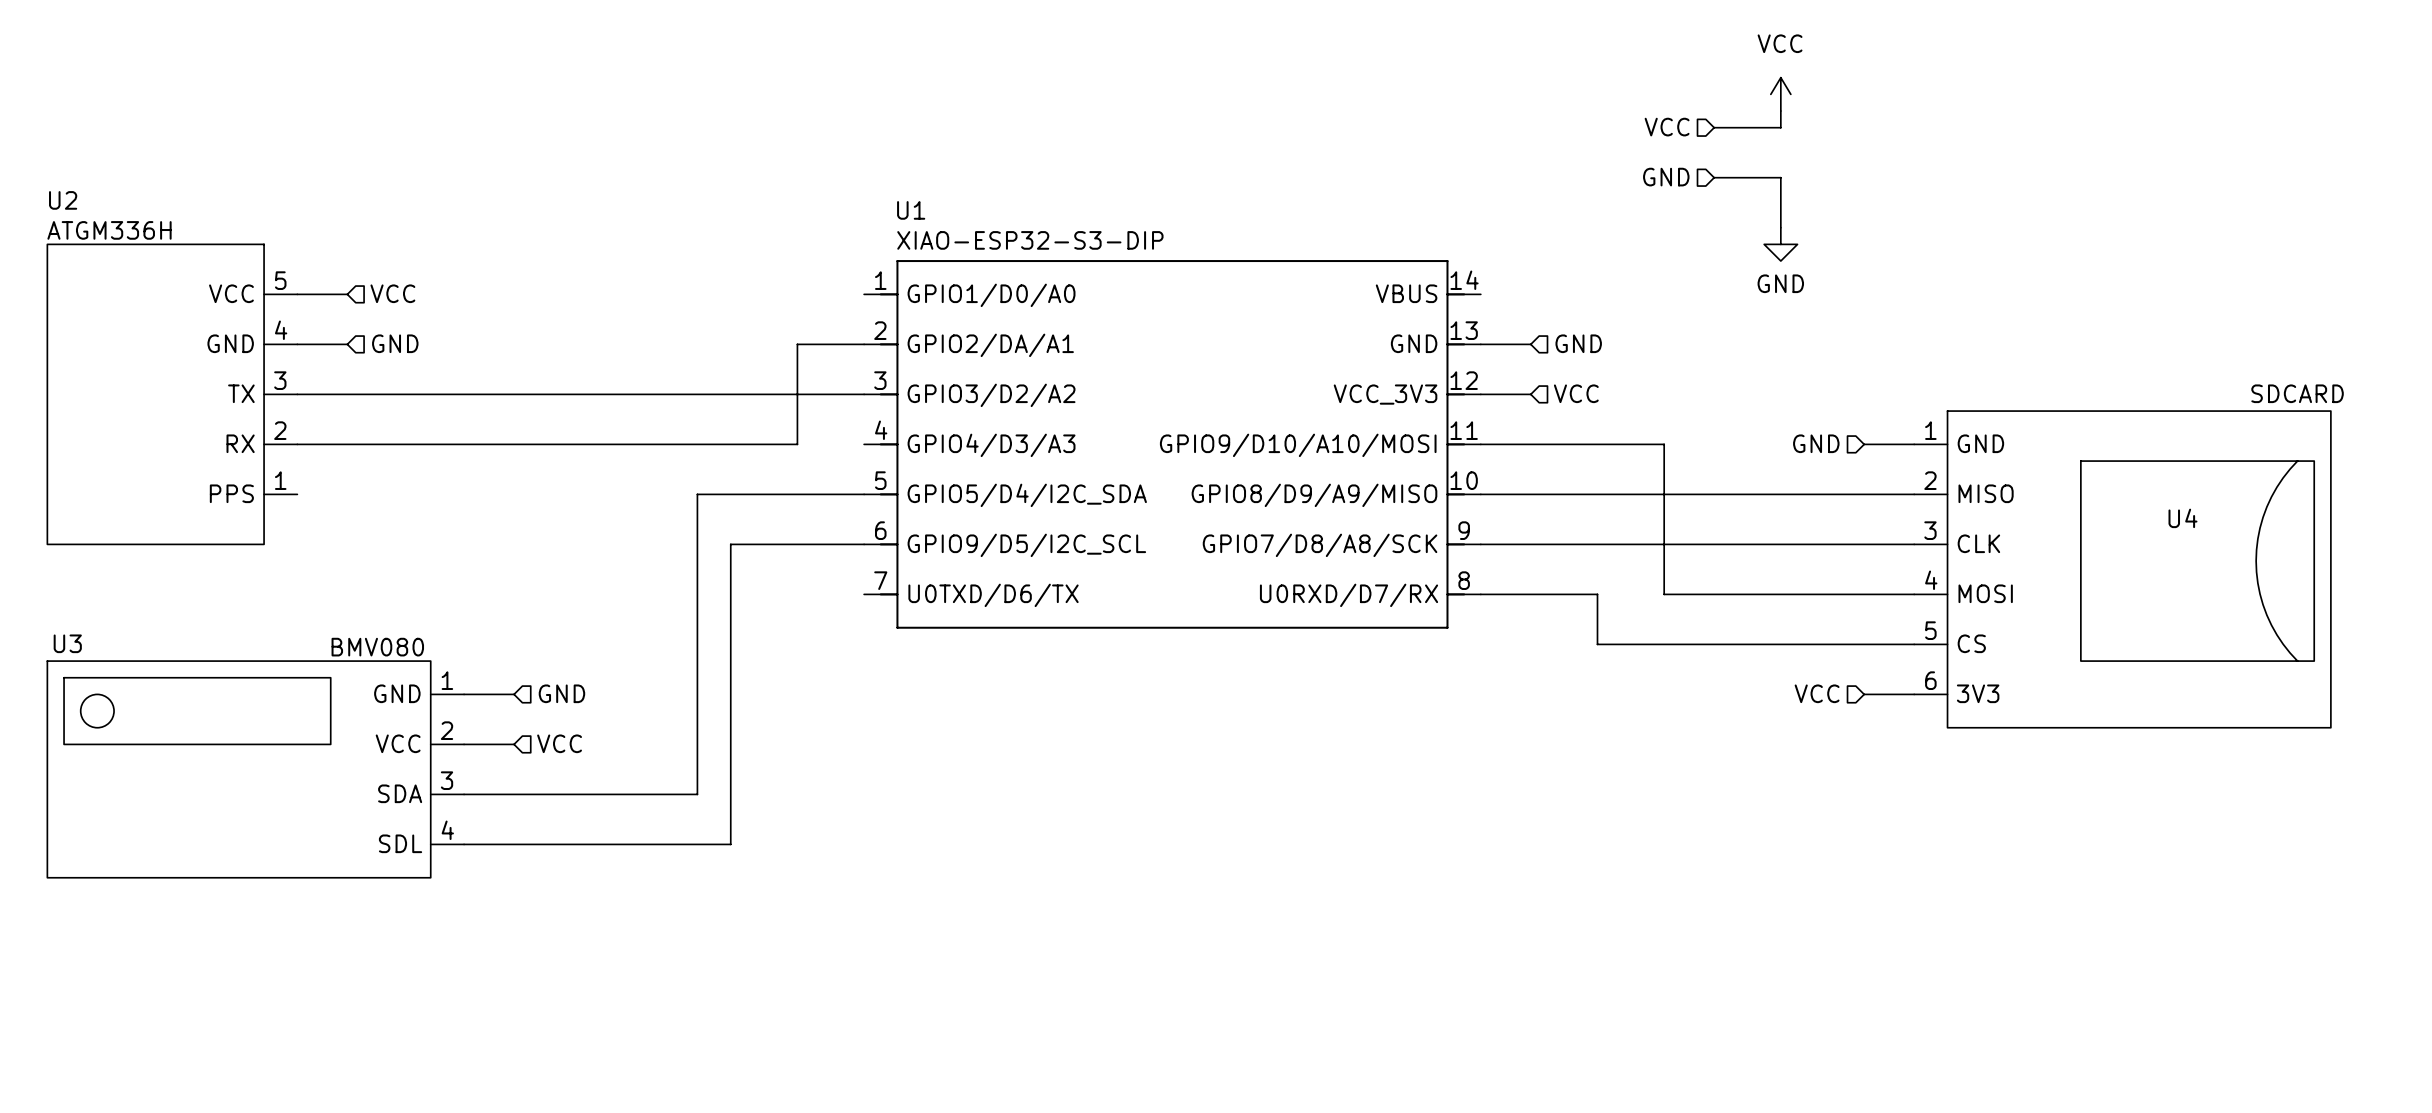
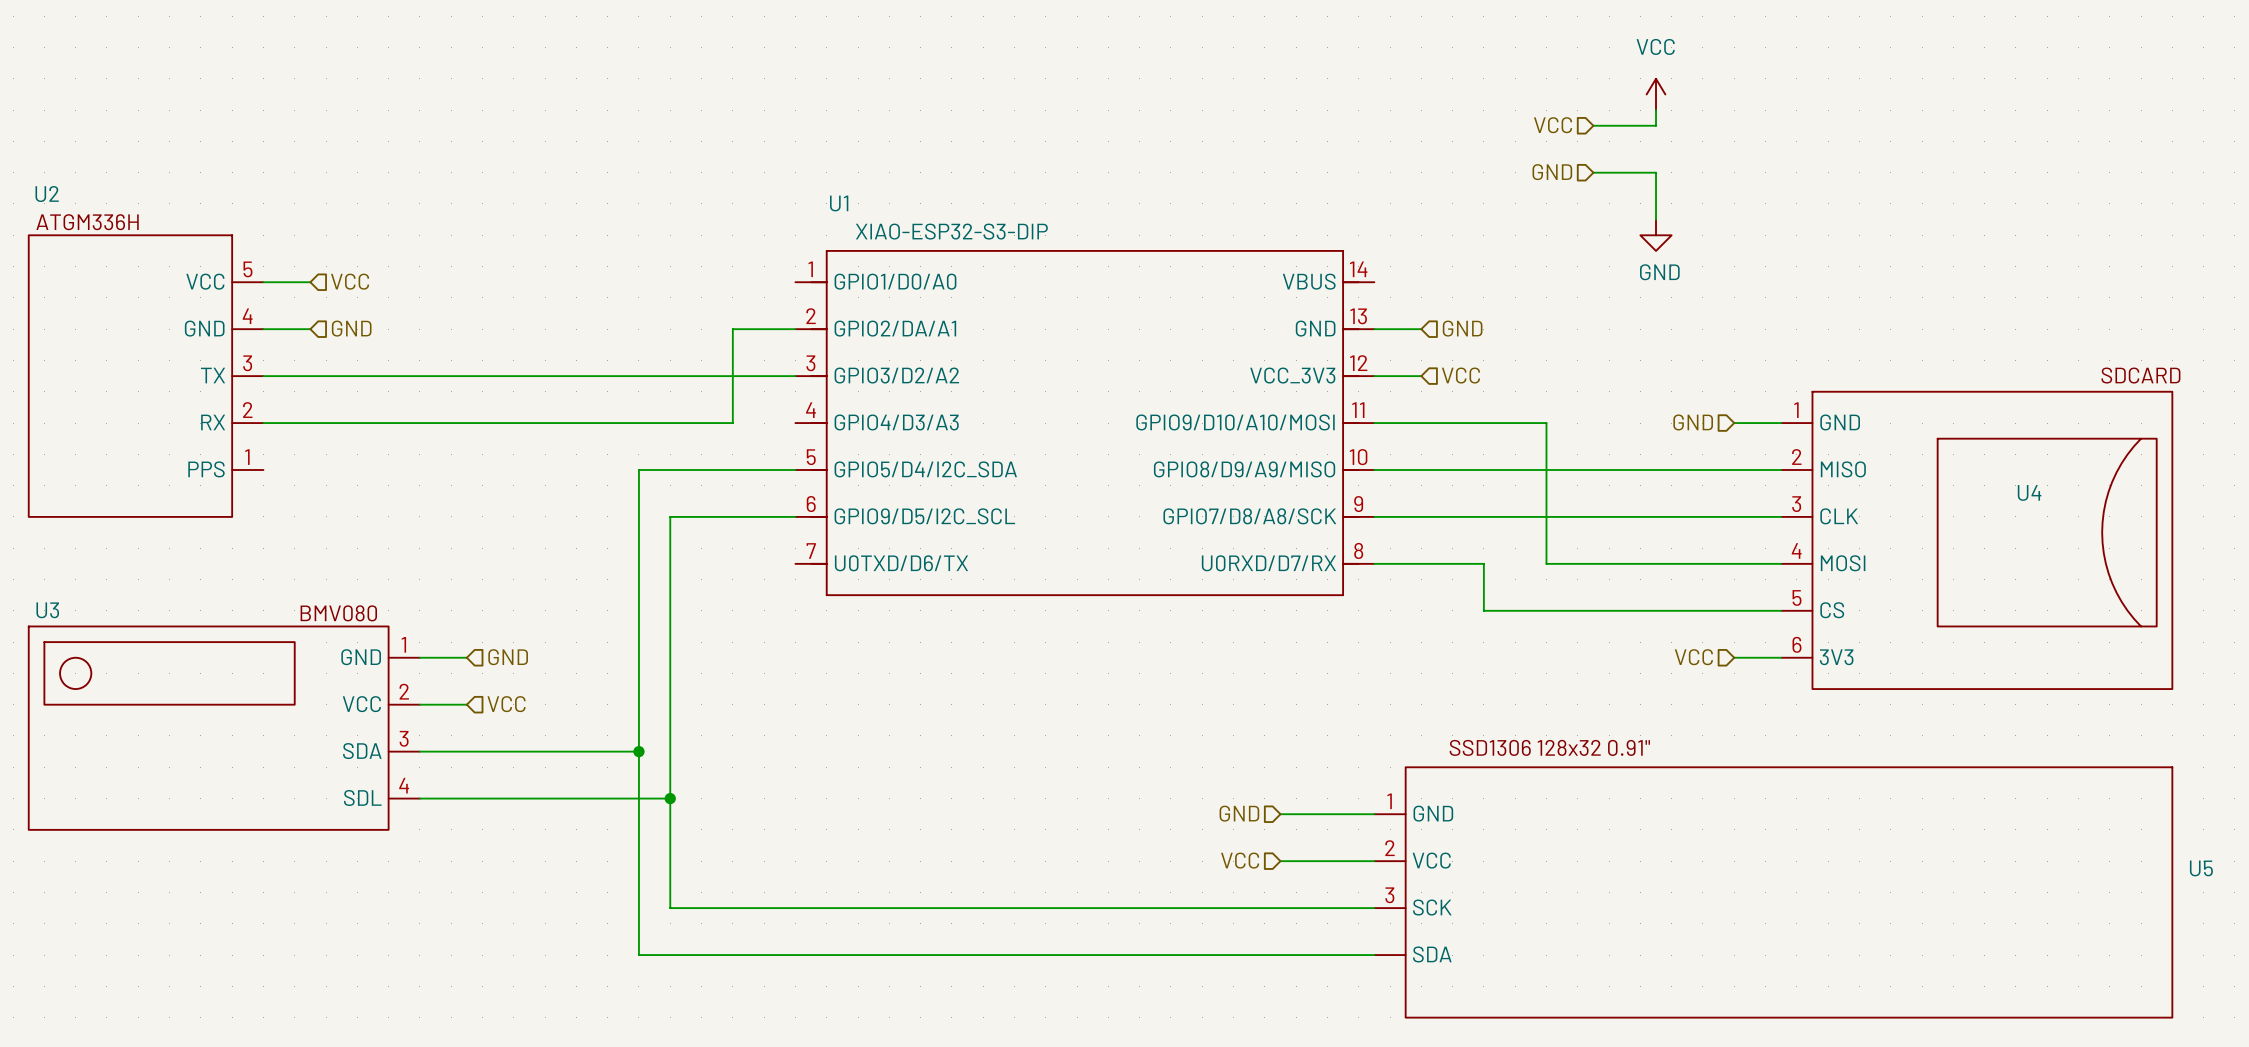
wire: none -> (638, 751) (638, 955) (1374, 955)
junction: none -> (638, 751)
wire: none -> (670, 798) (670, 908) (1374, 908)
junction: none -> (670, 798)
hierarchical label: none -> GND (1239, 813)
wire: none -> (1280, 814) (1374, 814)
hierarchical label: none -> VCC (1240, 860)
wire: none -> (1280, 861) (1374, 861)
U5: none -> (1773, 892)

